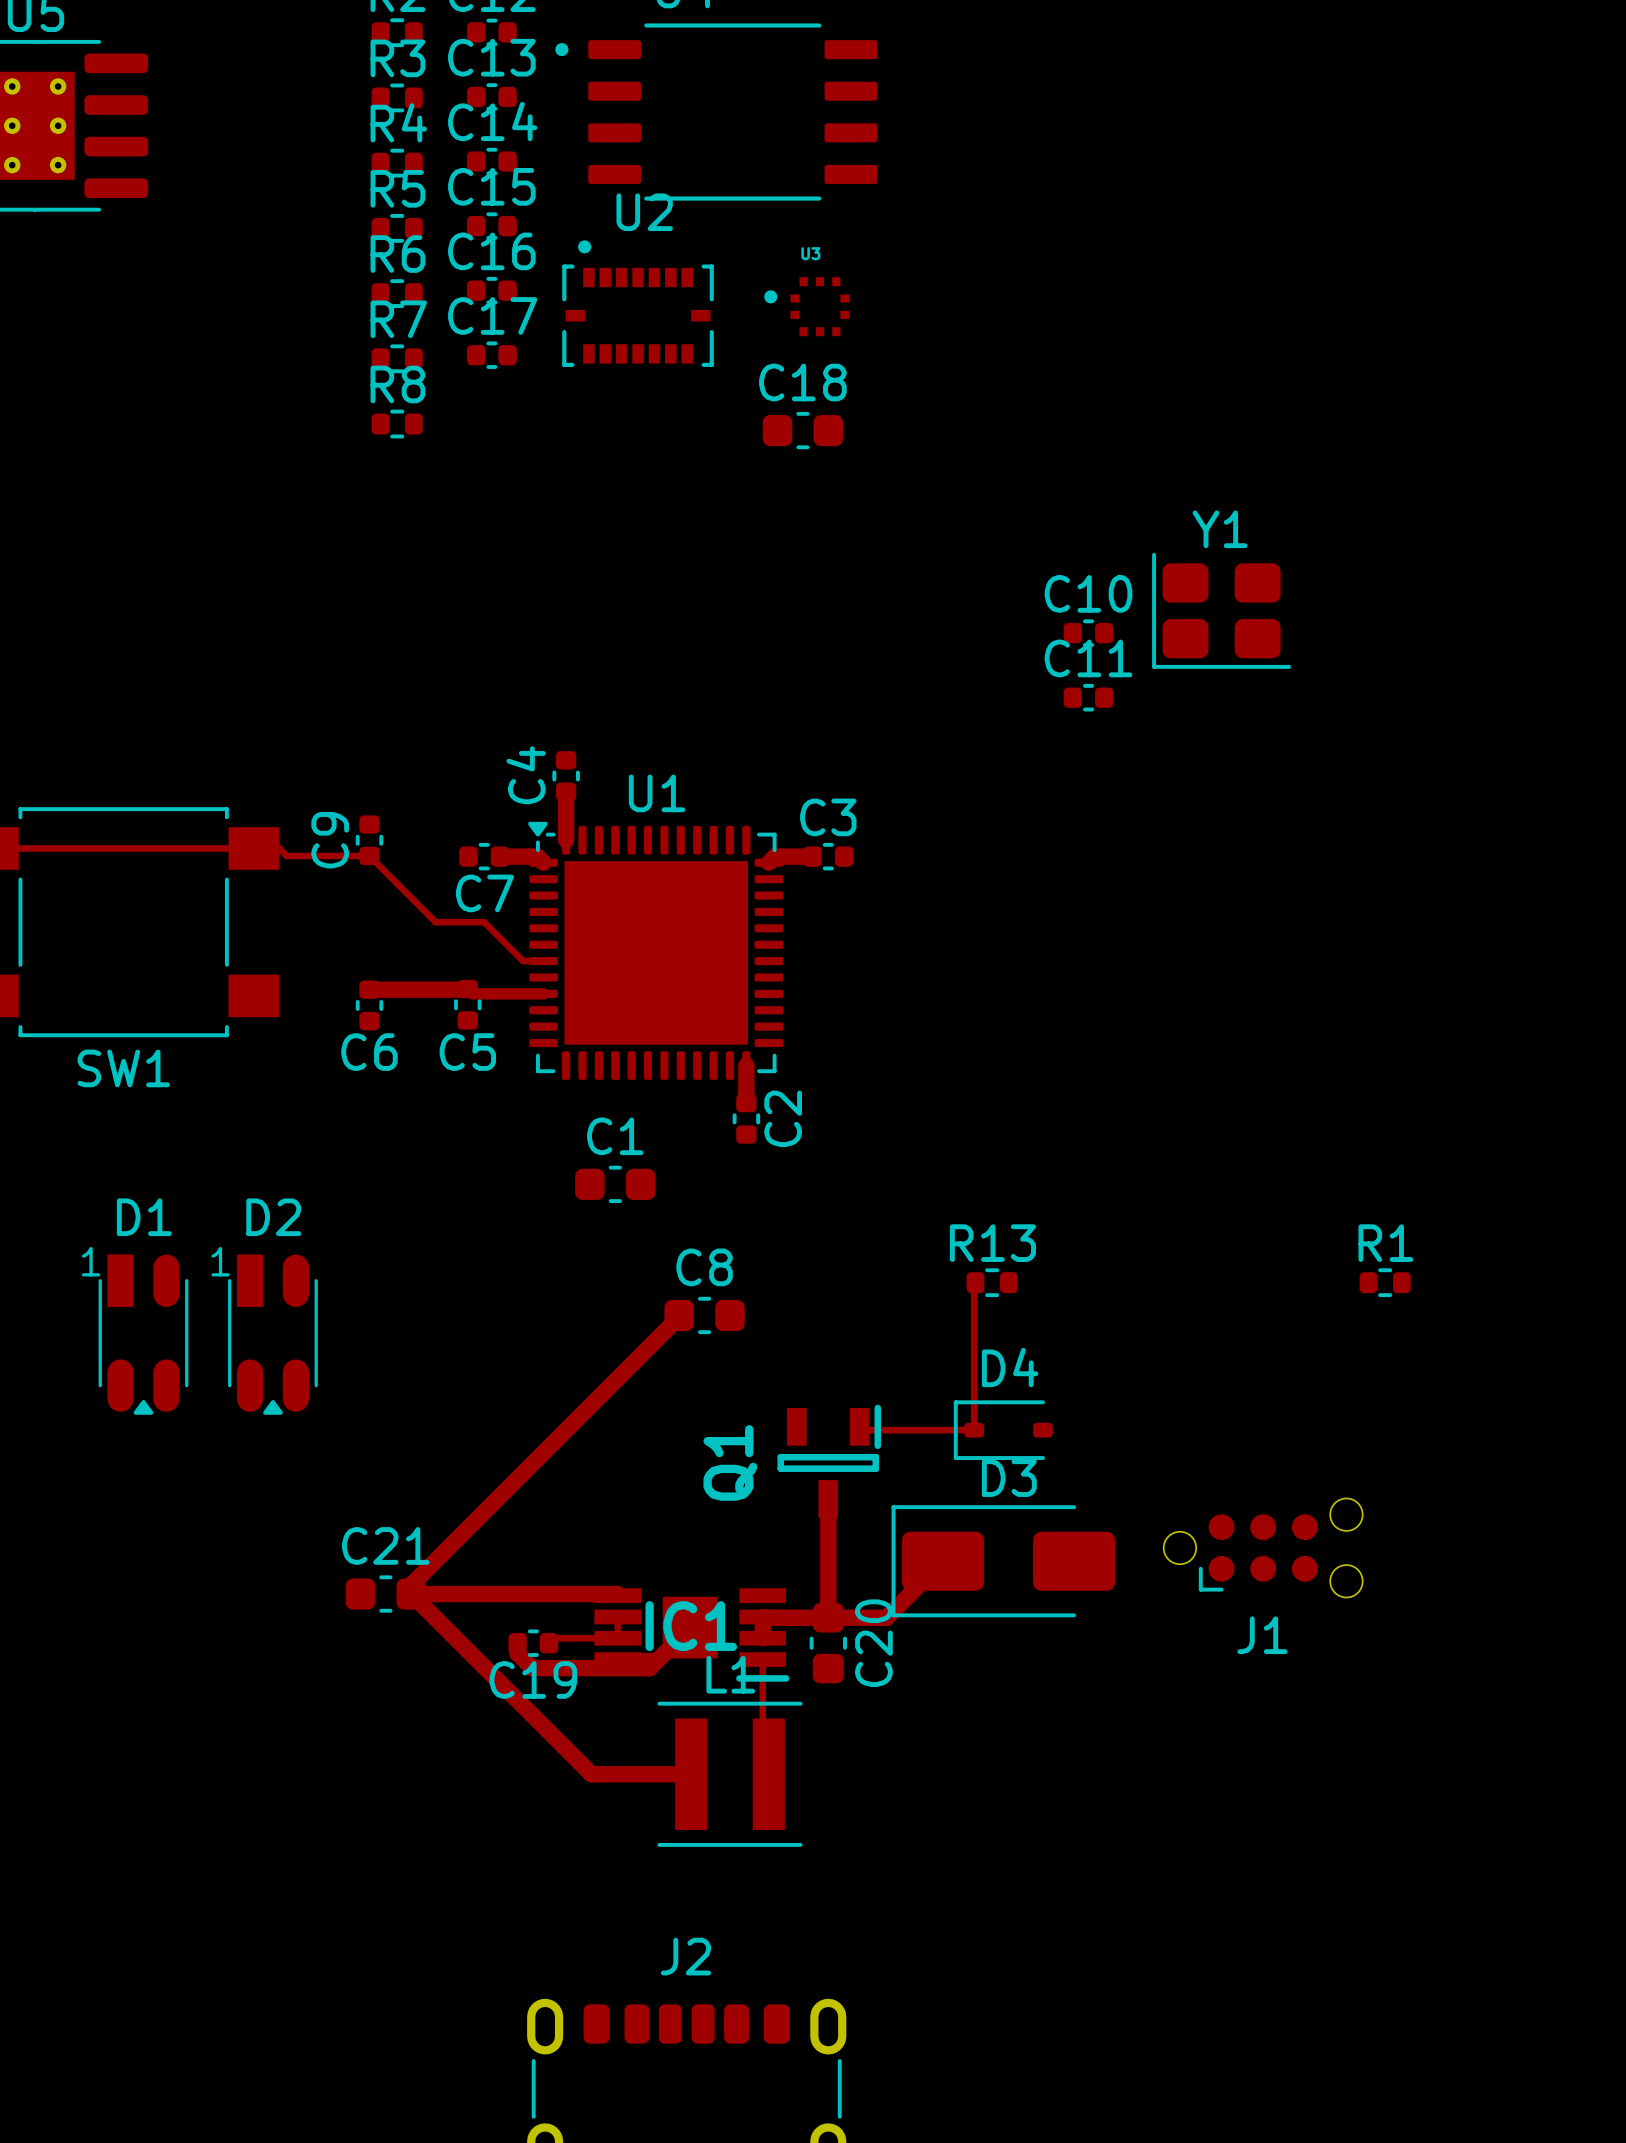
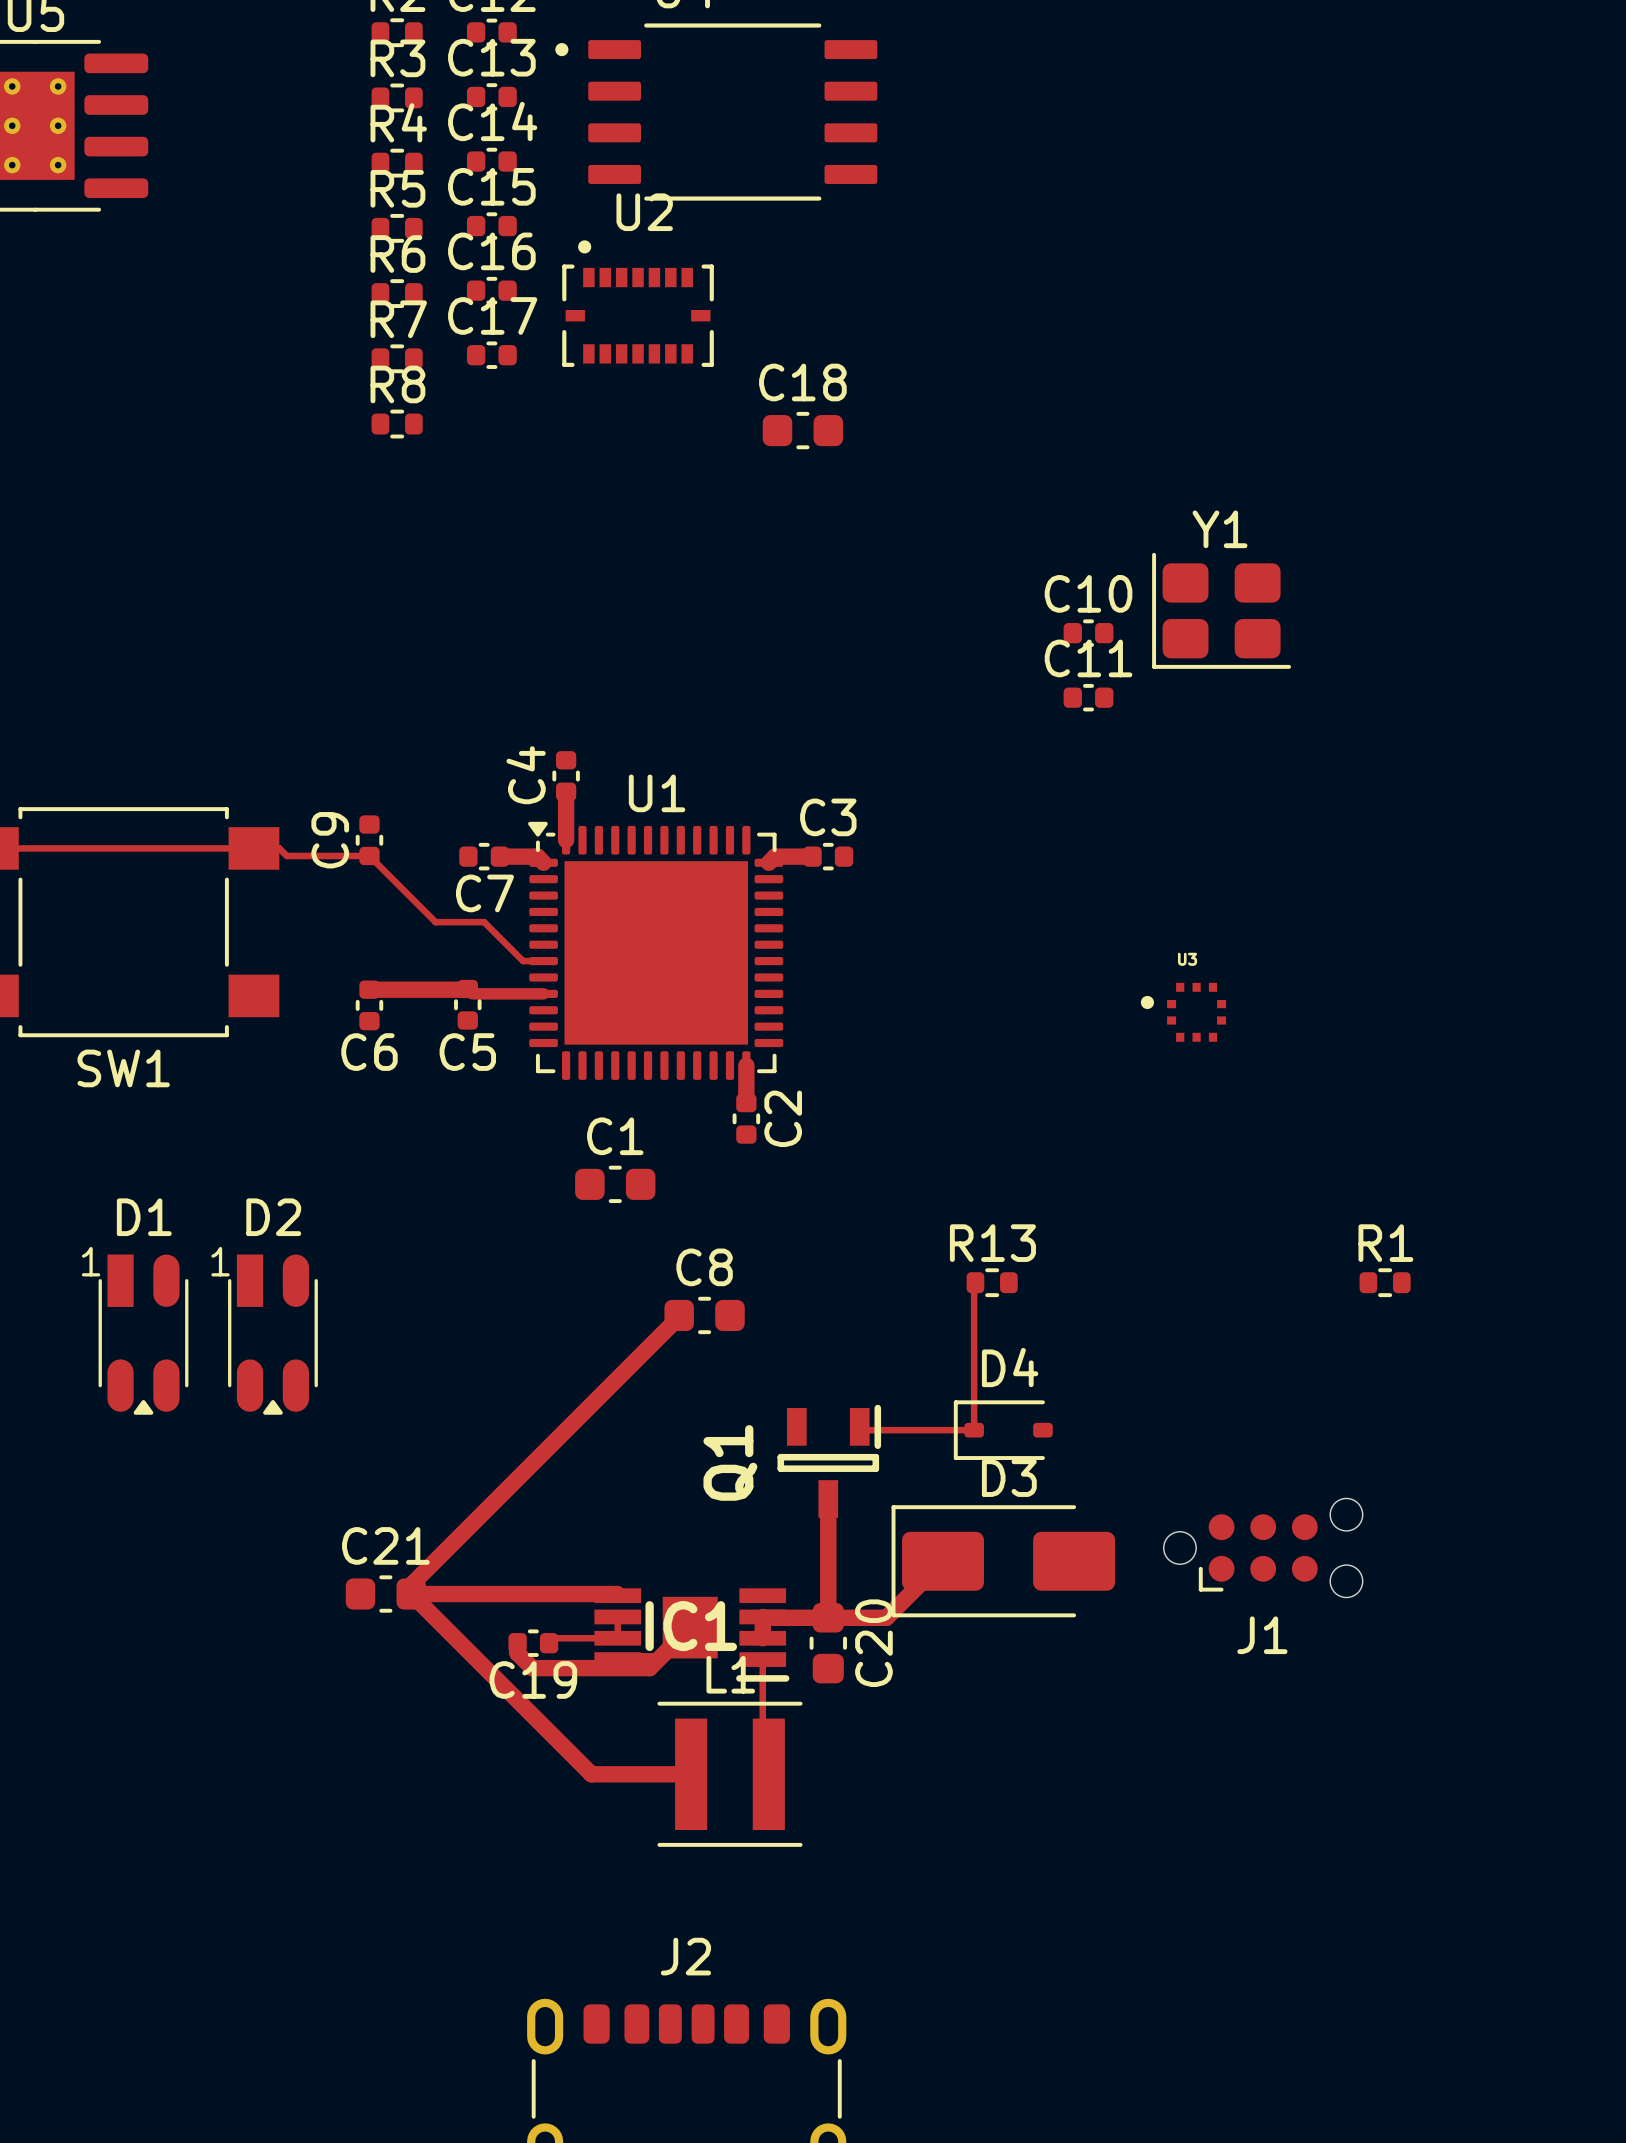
U3 position: (806, 306) -> (1183, 1012)

